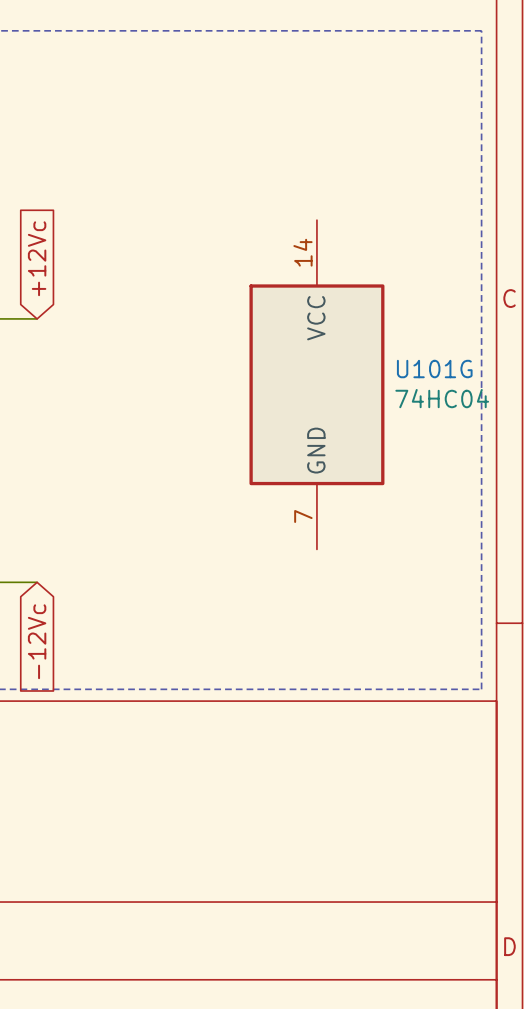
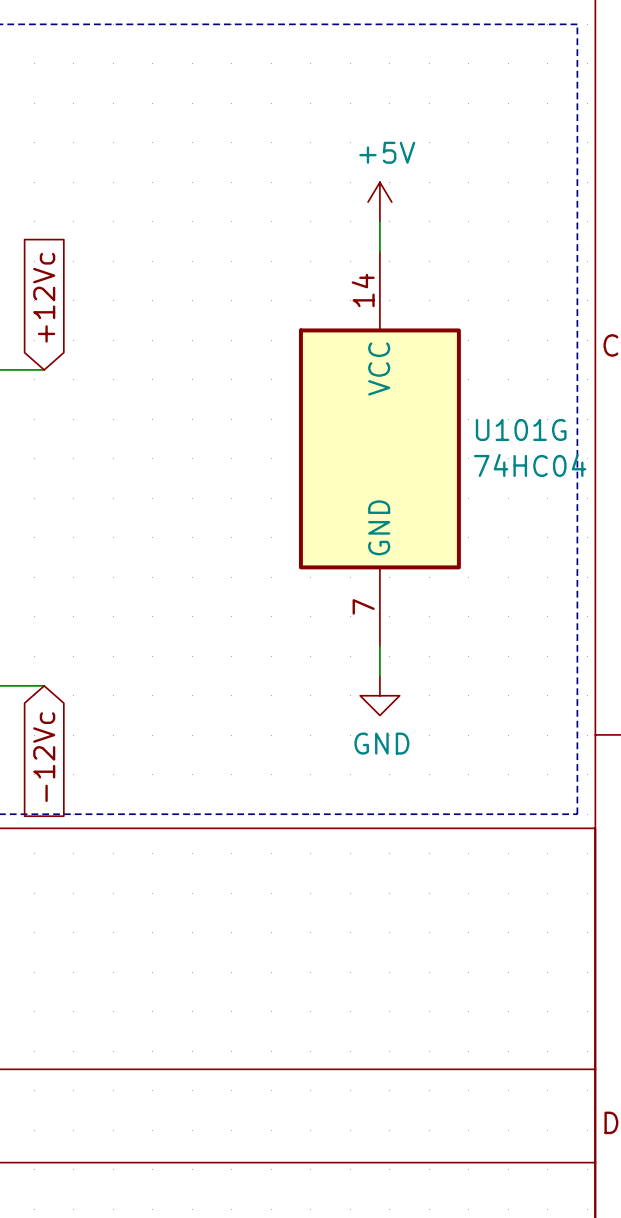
power symbol: none -> +5V (379, 202)
wire: none -> (379, 221) (379, 251)
wire: none -> (379, 646) (379, 676)
power symbol: none -> GND (379, 695)

